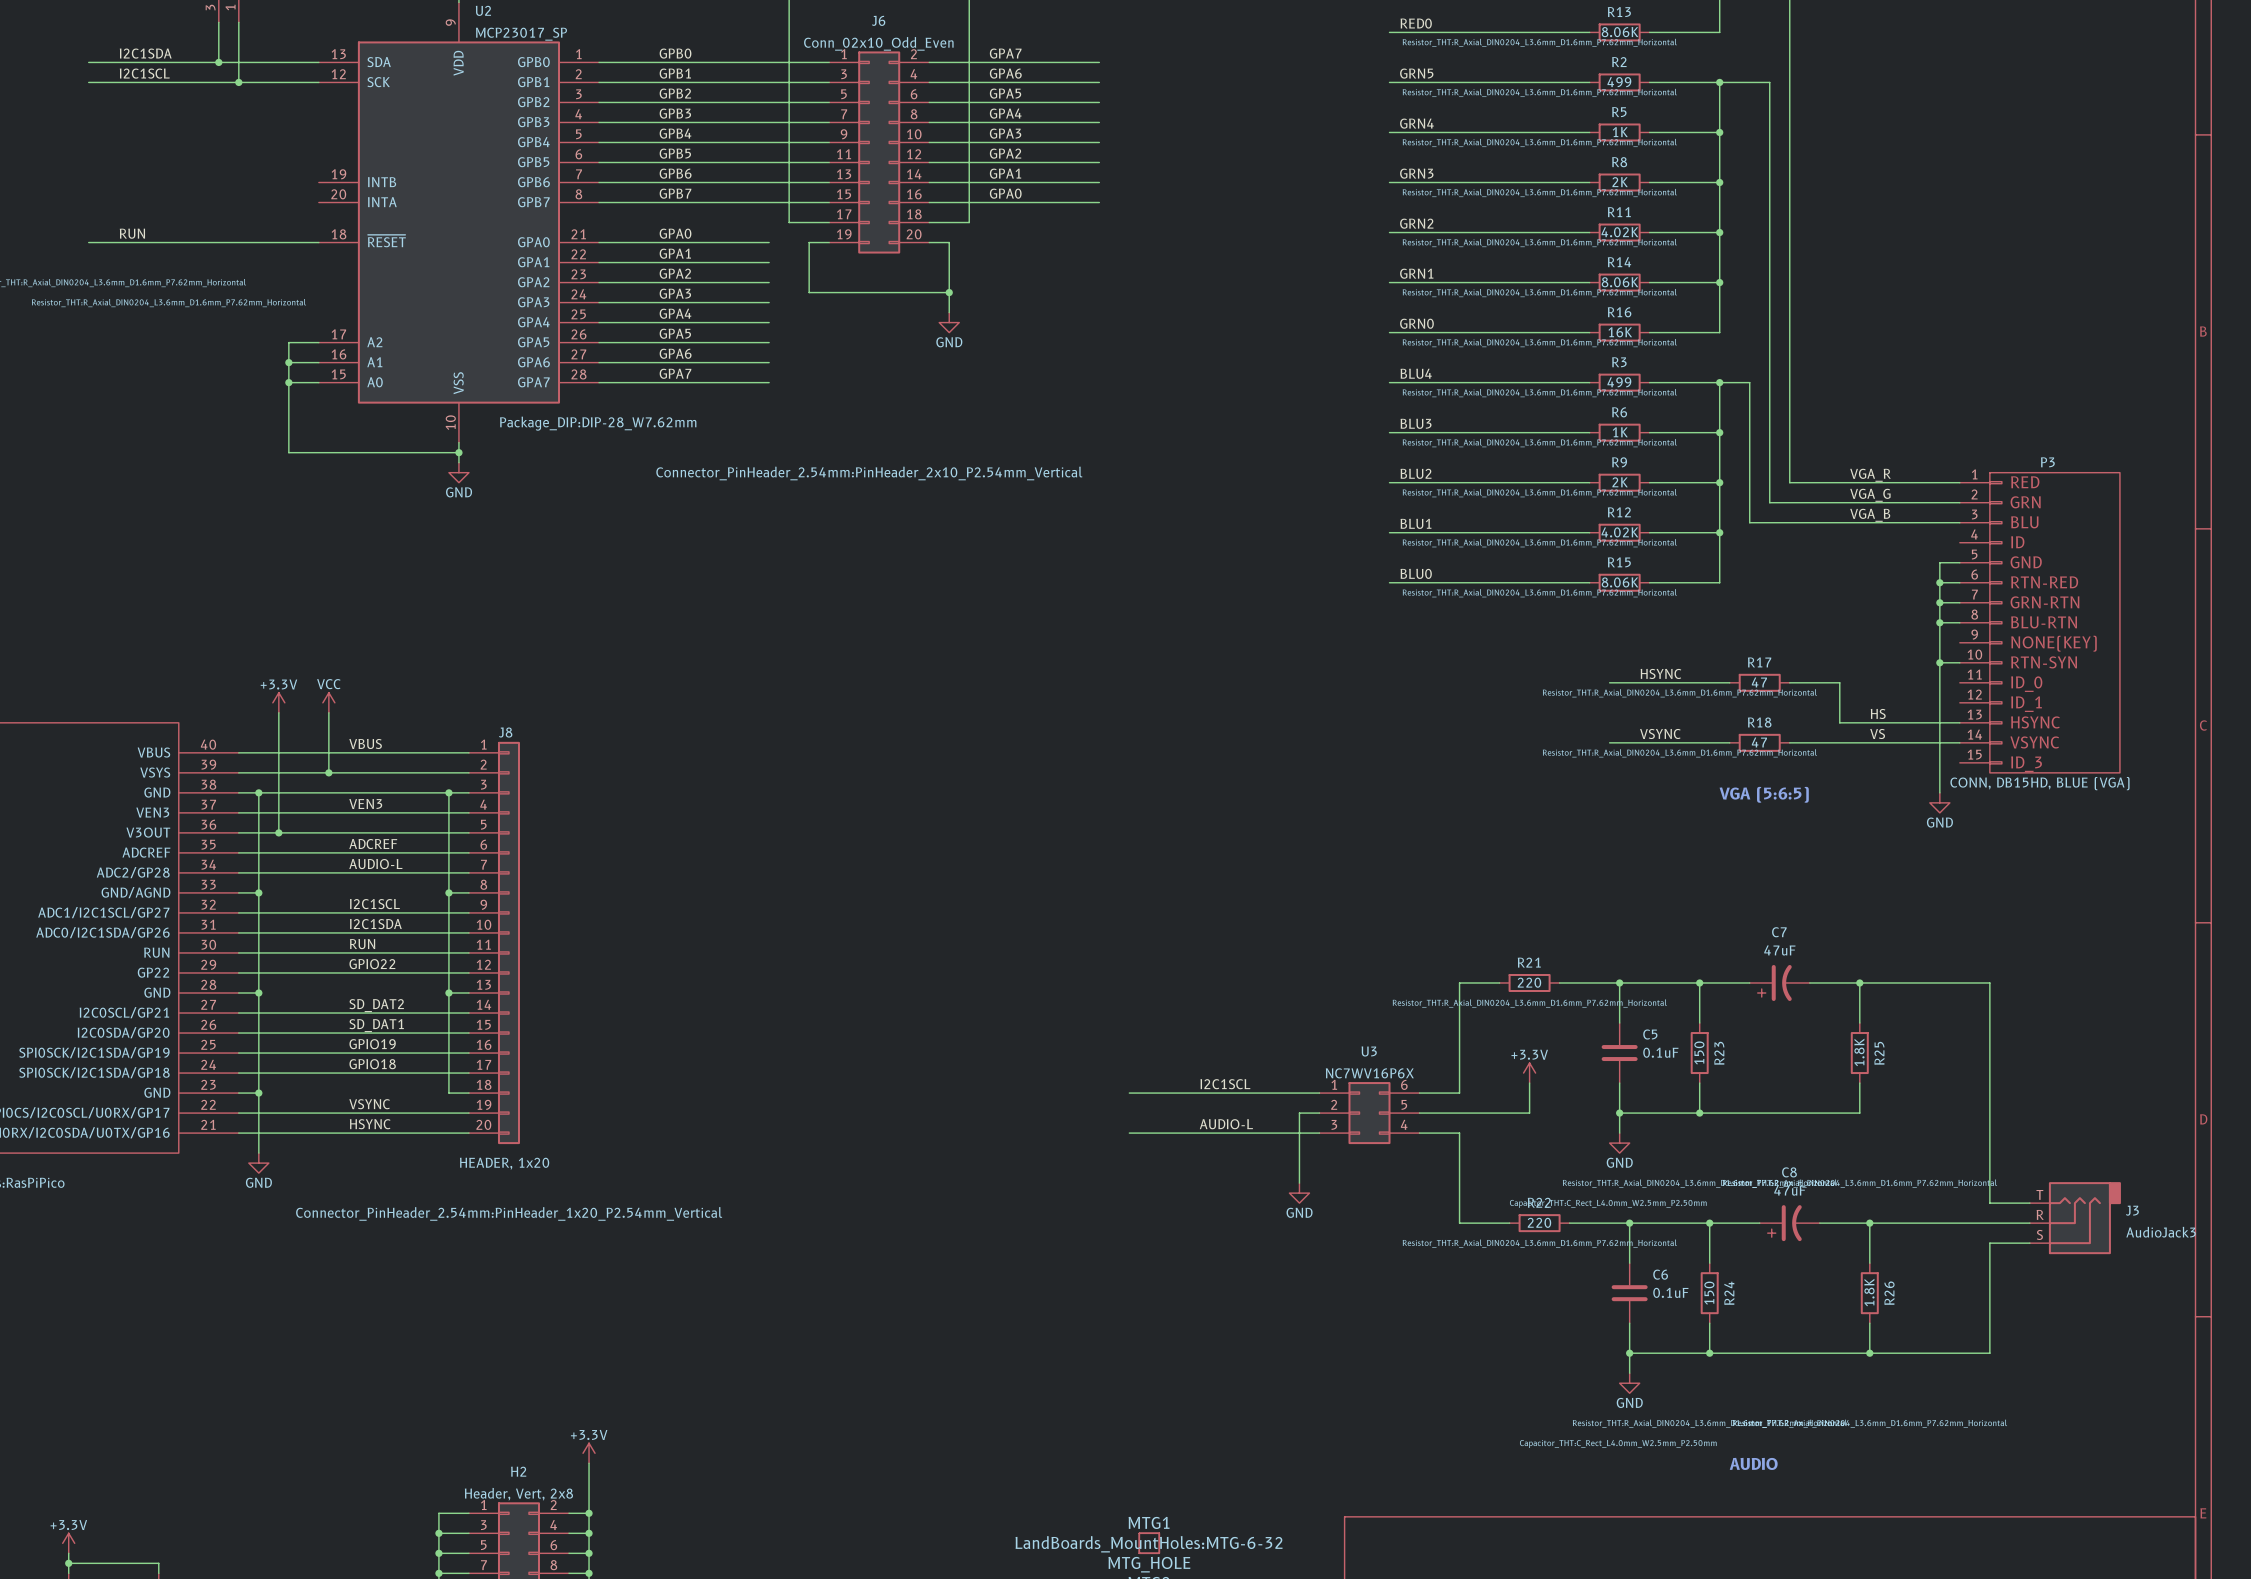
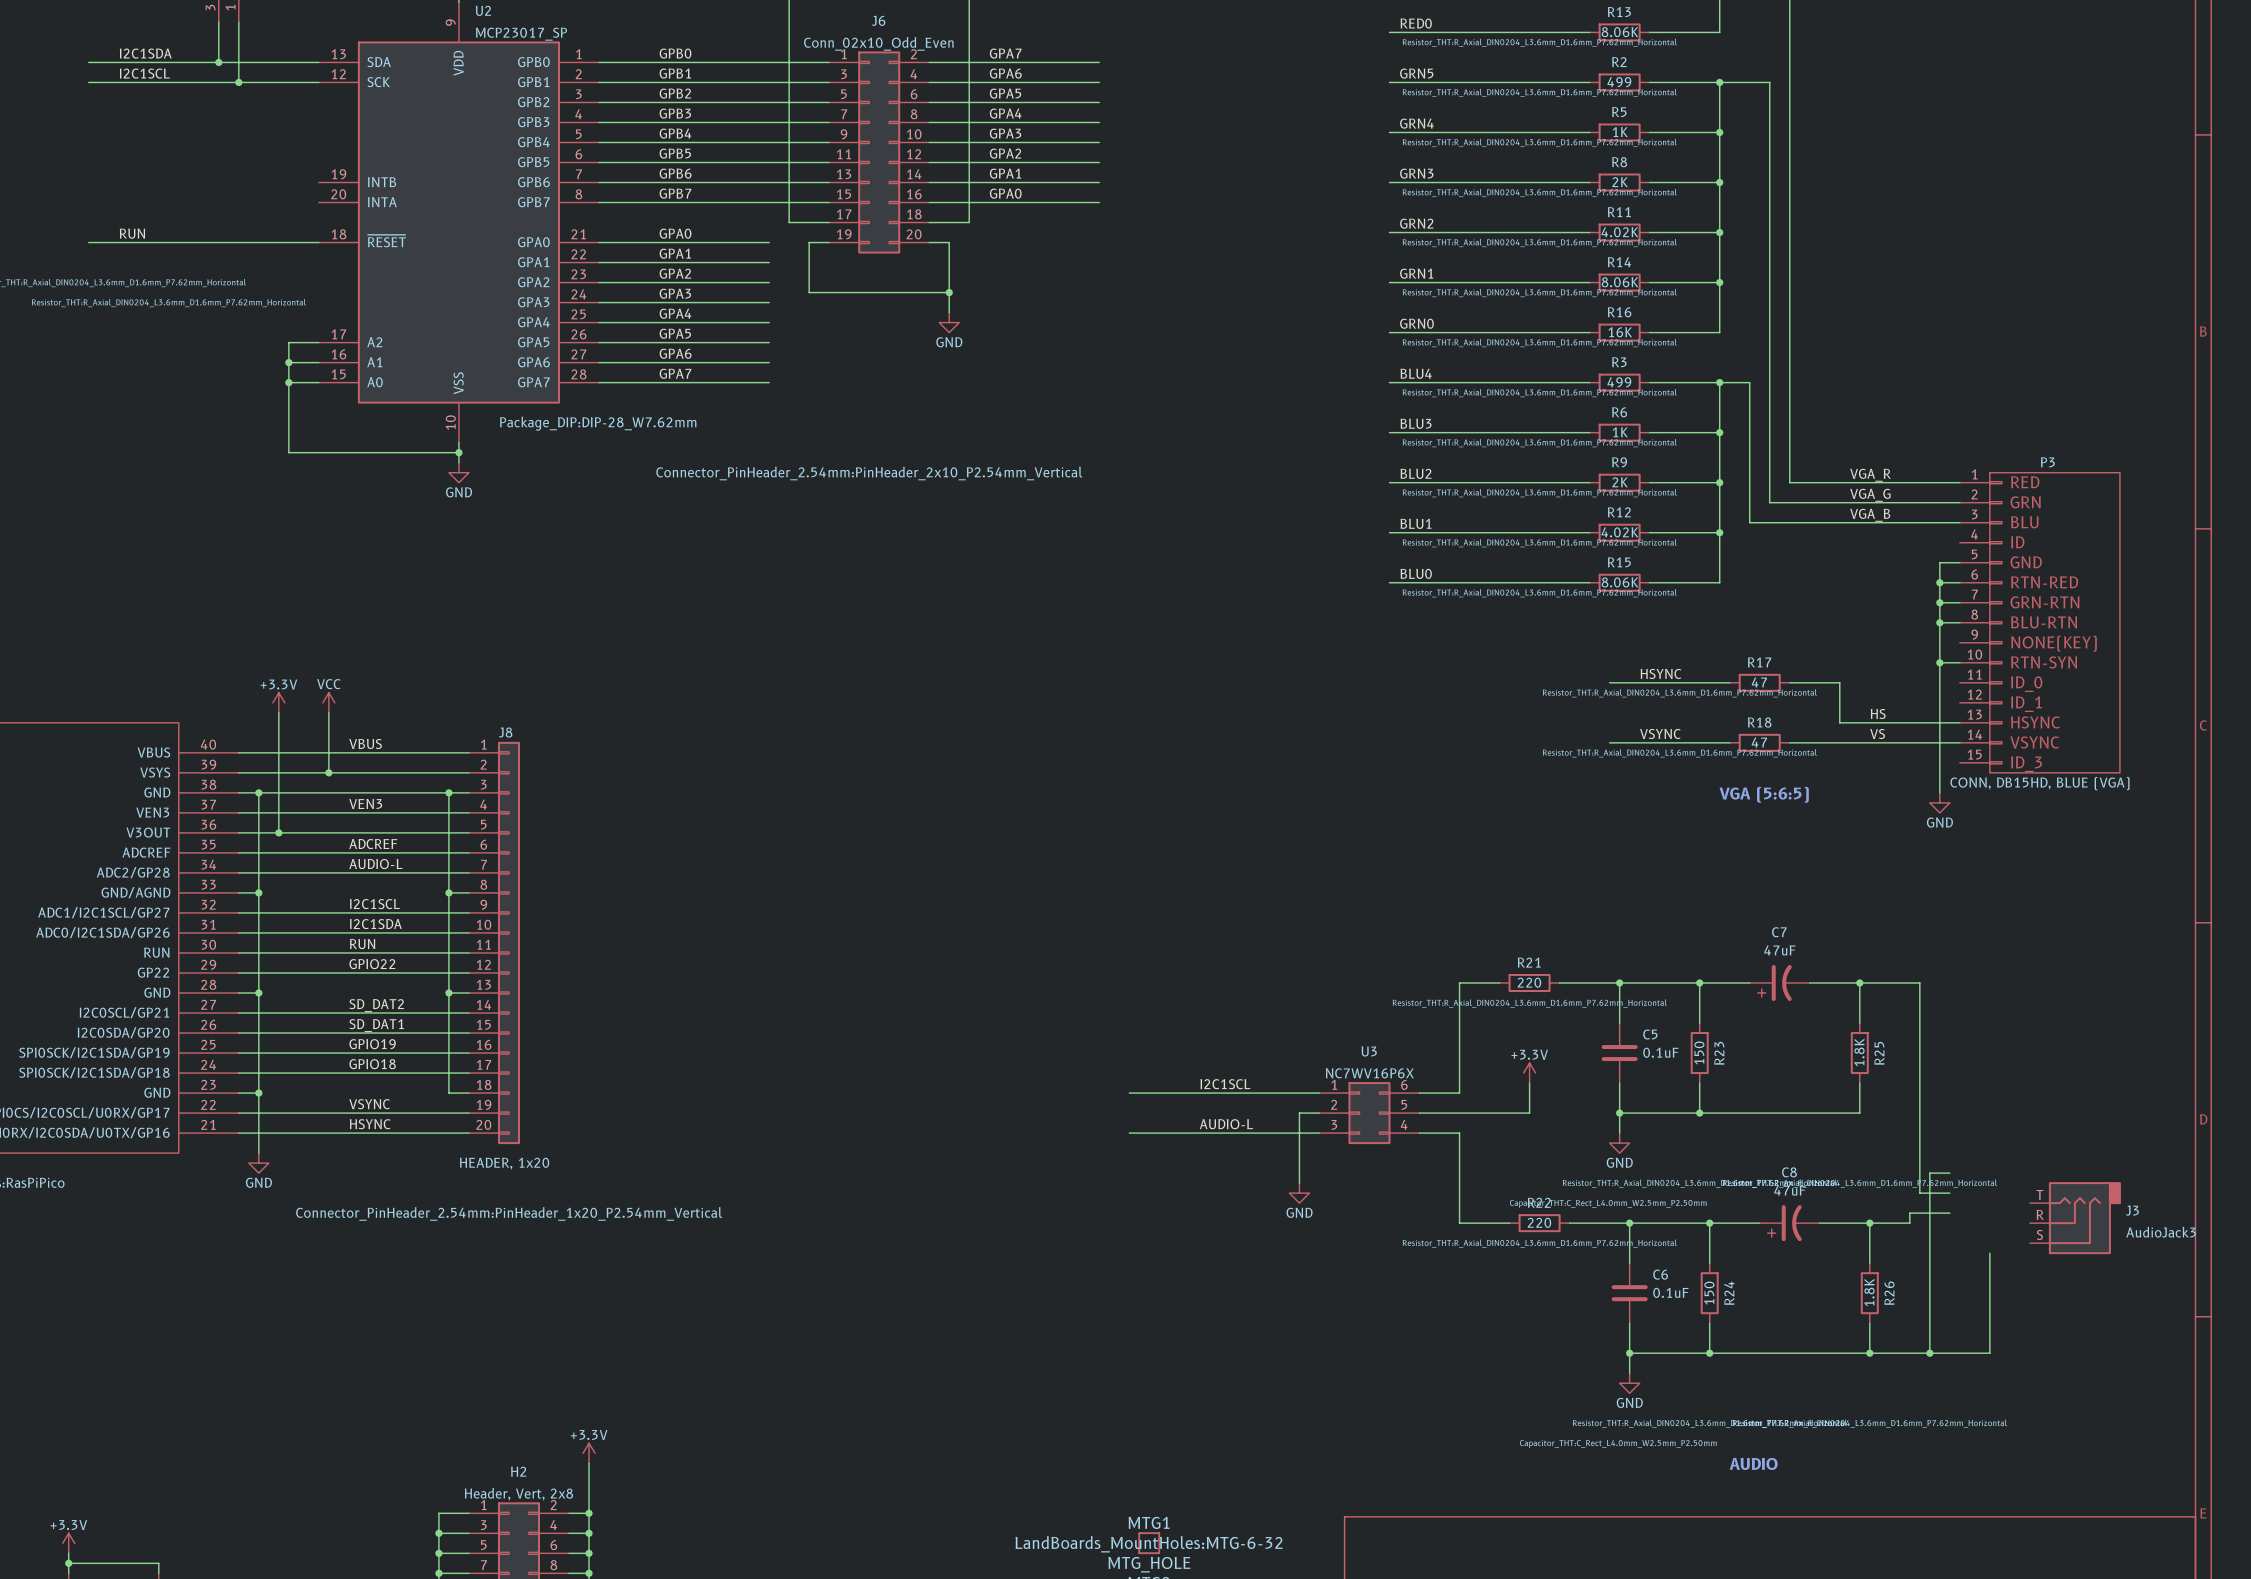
wire: (1919, 982) (1989, 982) (1989, 1203) (2029, 1203) -> (1919, 982) (1919, 1193) (1949, 1193)
wire: none -> (1949, 1173) (1929, 1173) (1929, 1353)
wire: (1909, 1223) (2029, 1223) -> (1909, 1223) (1909, 1213) (1949, 1213)
wire: (2029, 1243) (1989, 1243) (1989, 1253) -> none
junction: none -> (1929, 1353)

